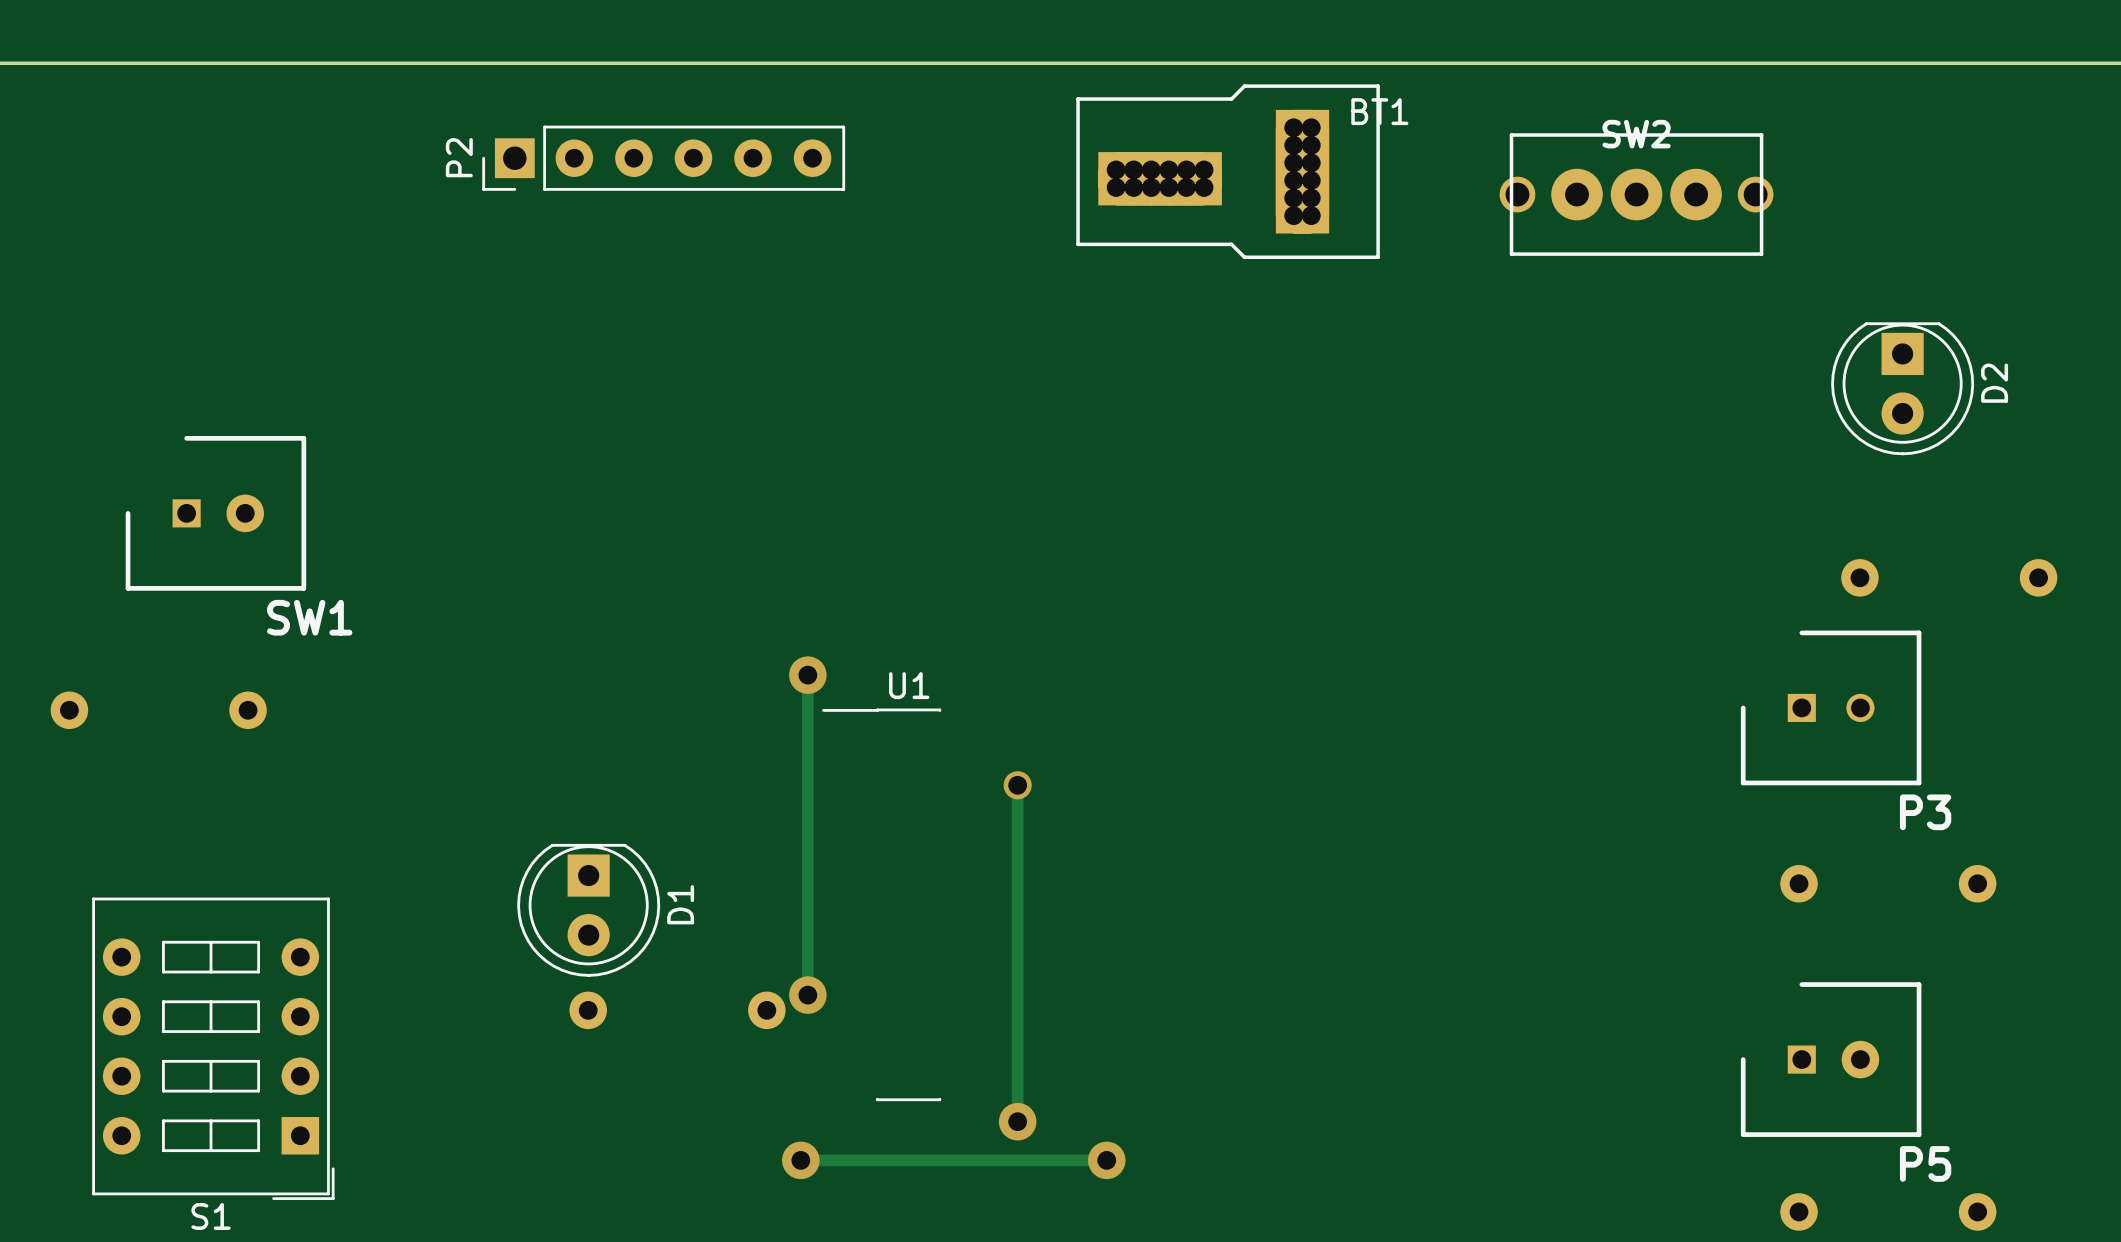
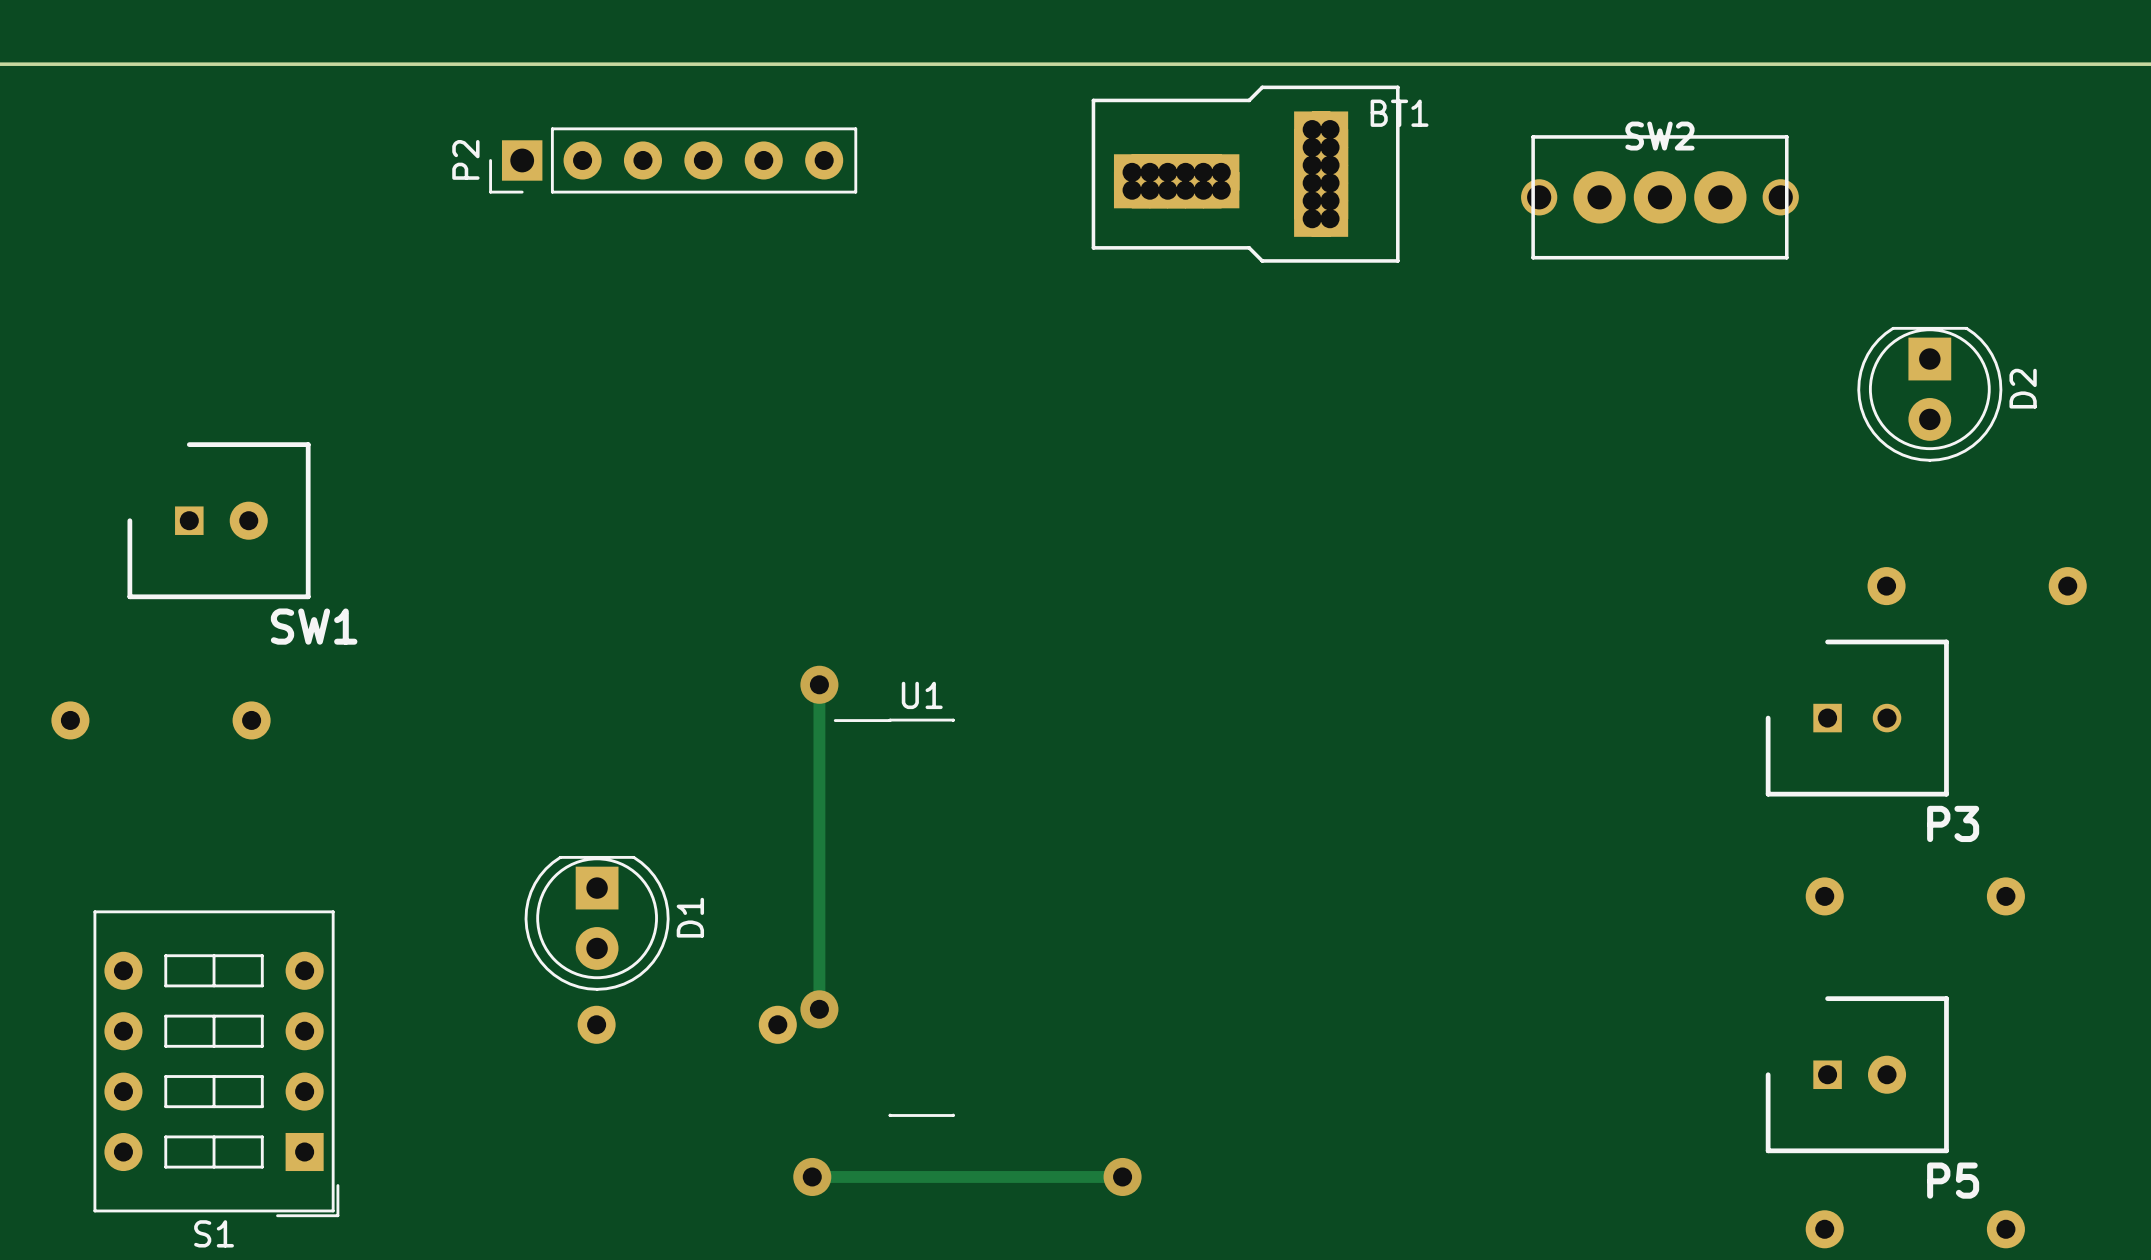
track: (1017, 785) (1017, 1121) -> none
via: (1017, 785) -> none
via: (1017, 1121) -> none

